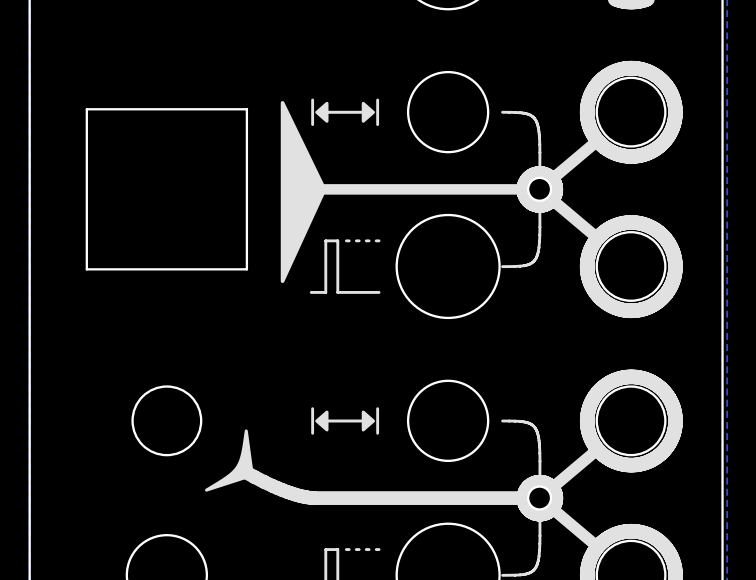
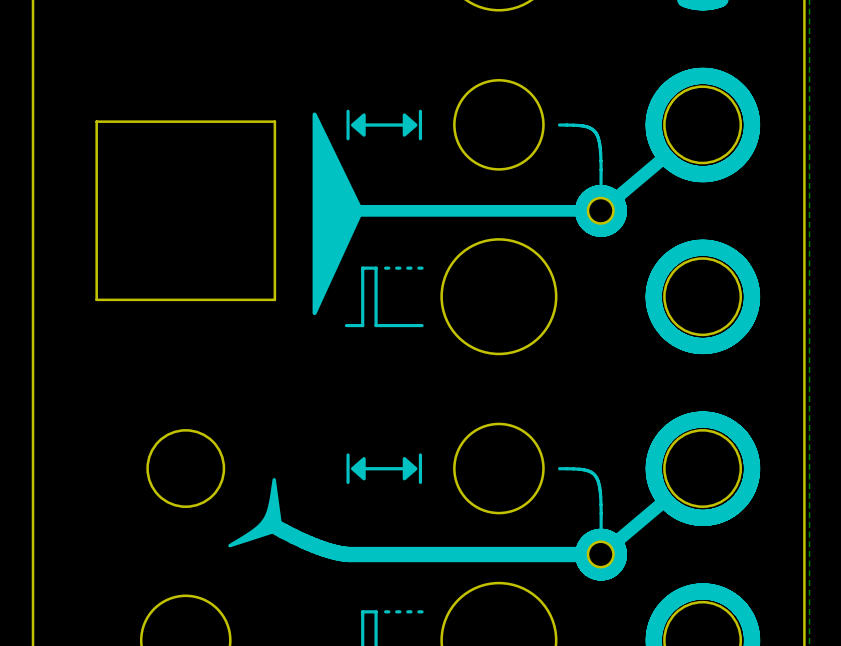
line: (553, 201) (597, 238) -> none
line: (539, 207) (539, 241) (535, 259) (526, 265) (502, 266) -> none
line: (553, 509) (597, 546) -> none
line: (539, 516) (539, 550) (535, 567) (526, 573) (502, 575) -> none

